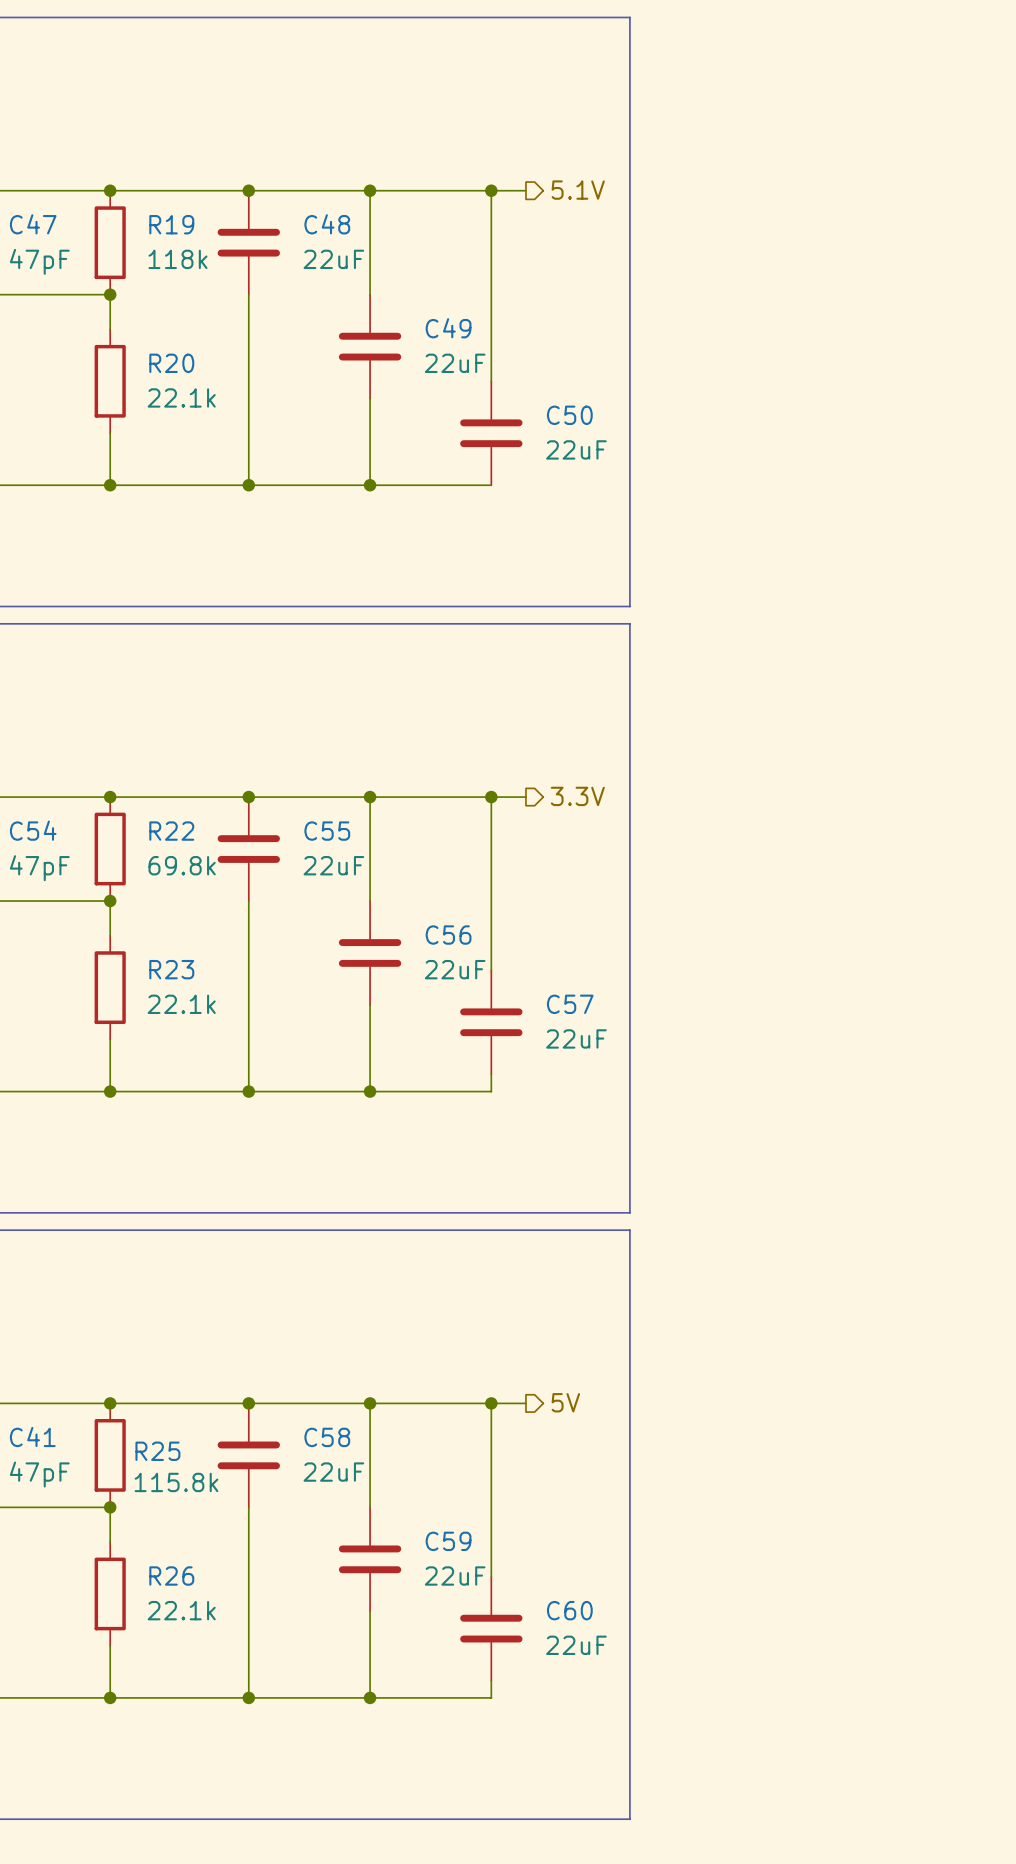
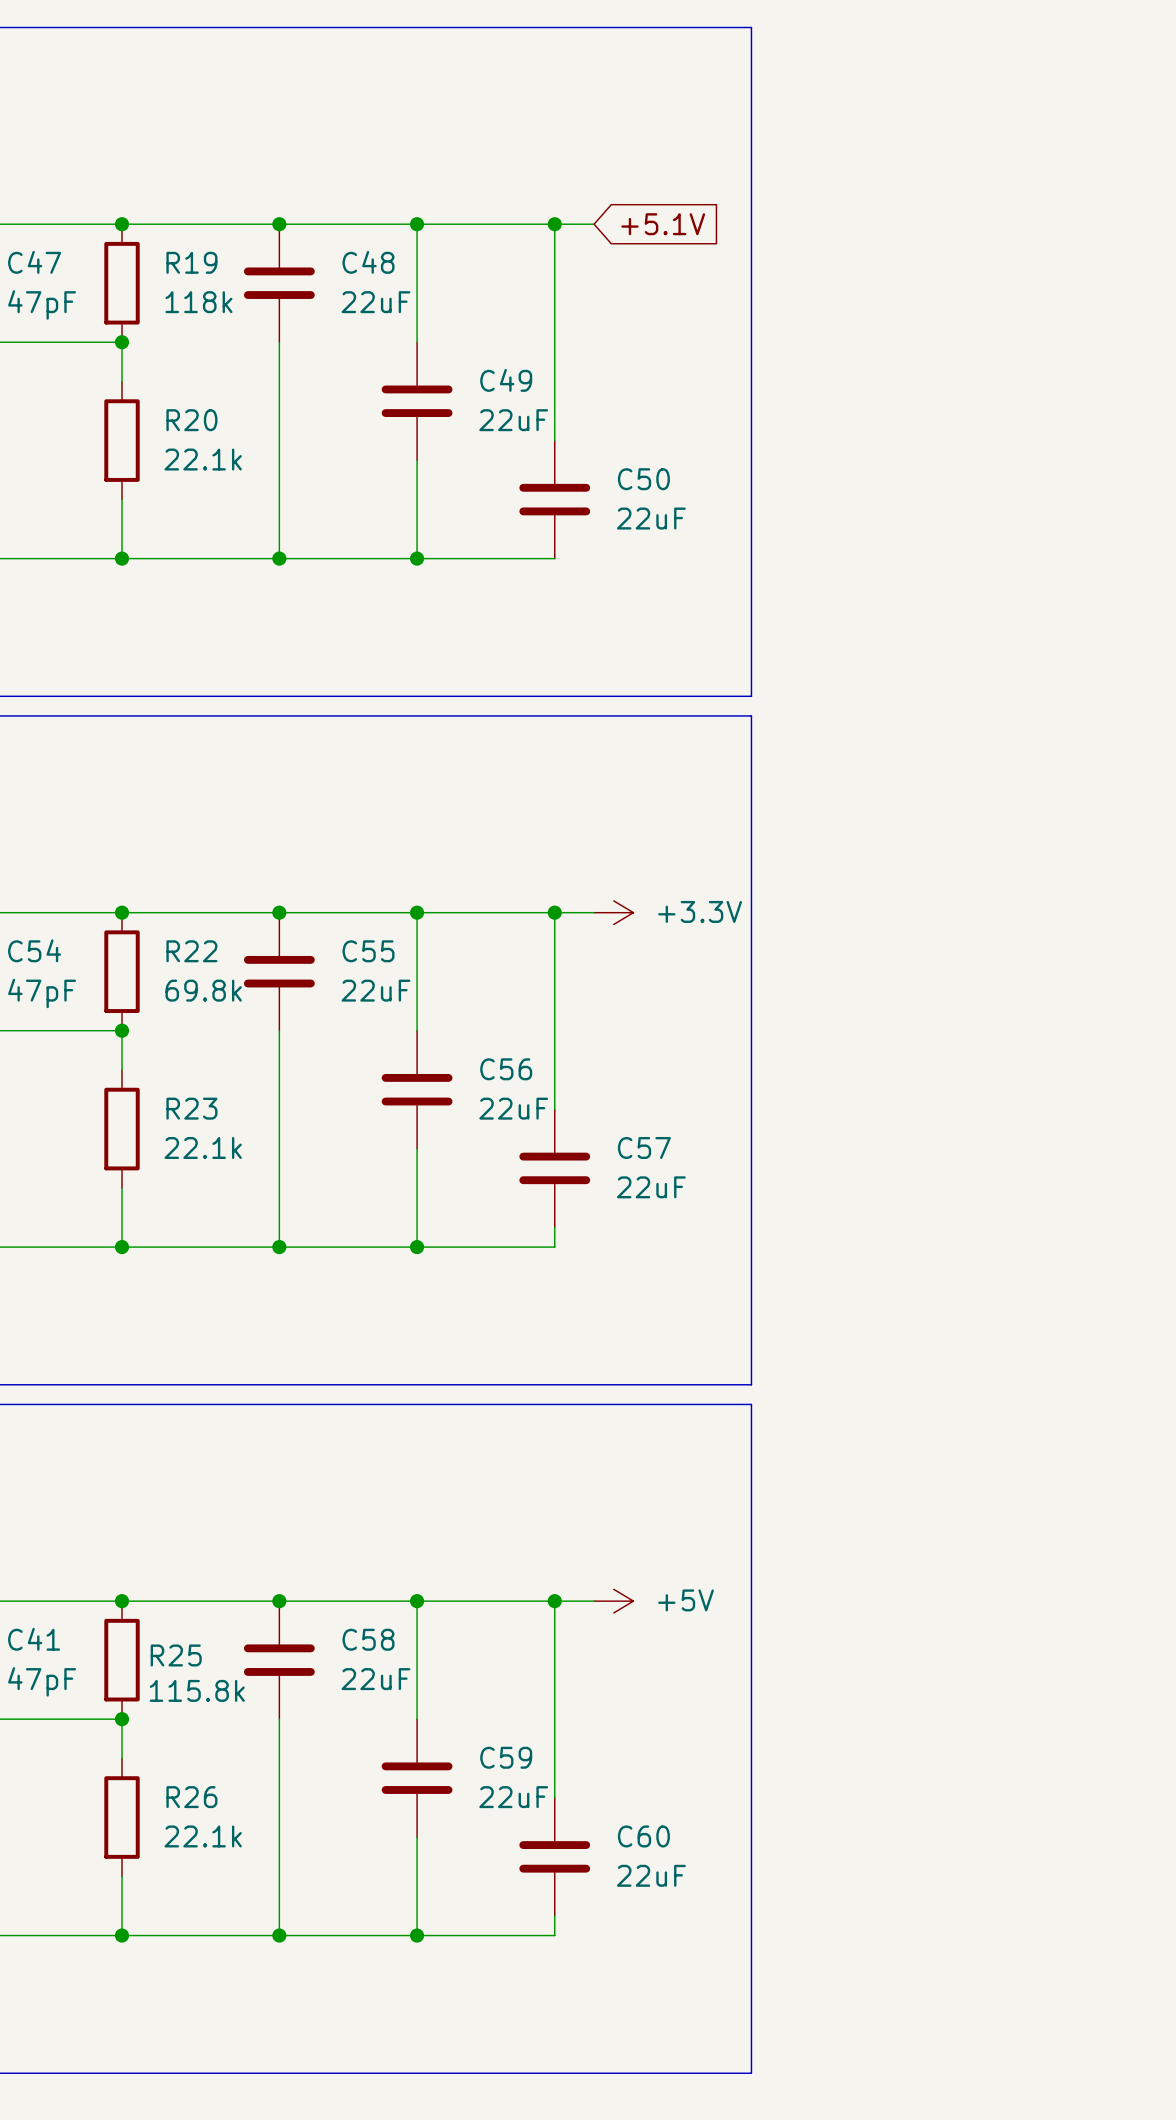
line: (629, 17) (629, 606) -> (712, 27) (751, 27) (751, 696) (712, 696)
hierarchical label: 5.1V (578, 190) -> none
global label: none -> +5.1V (663, 224)
line: (629, 623) (629, 1212) -> (712, 715) (751, 715) (751, 1384) (712, 1384)
hierarchical label: 3.3V (577, 796) -> none
power symbol: none -> +3.3V (613, 912)
line: (629, 1230) (629, 1819) -> (712, 1404) (751, 1404) (751, 2073) (712, 2073)
hierarchical label: 5V (565, 1402) -> none
power symbol: none -> +5V (613, 1601)

